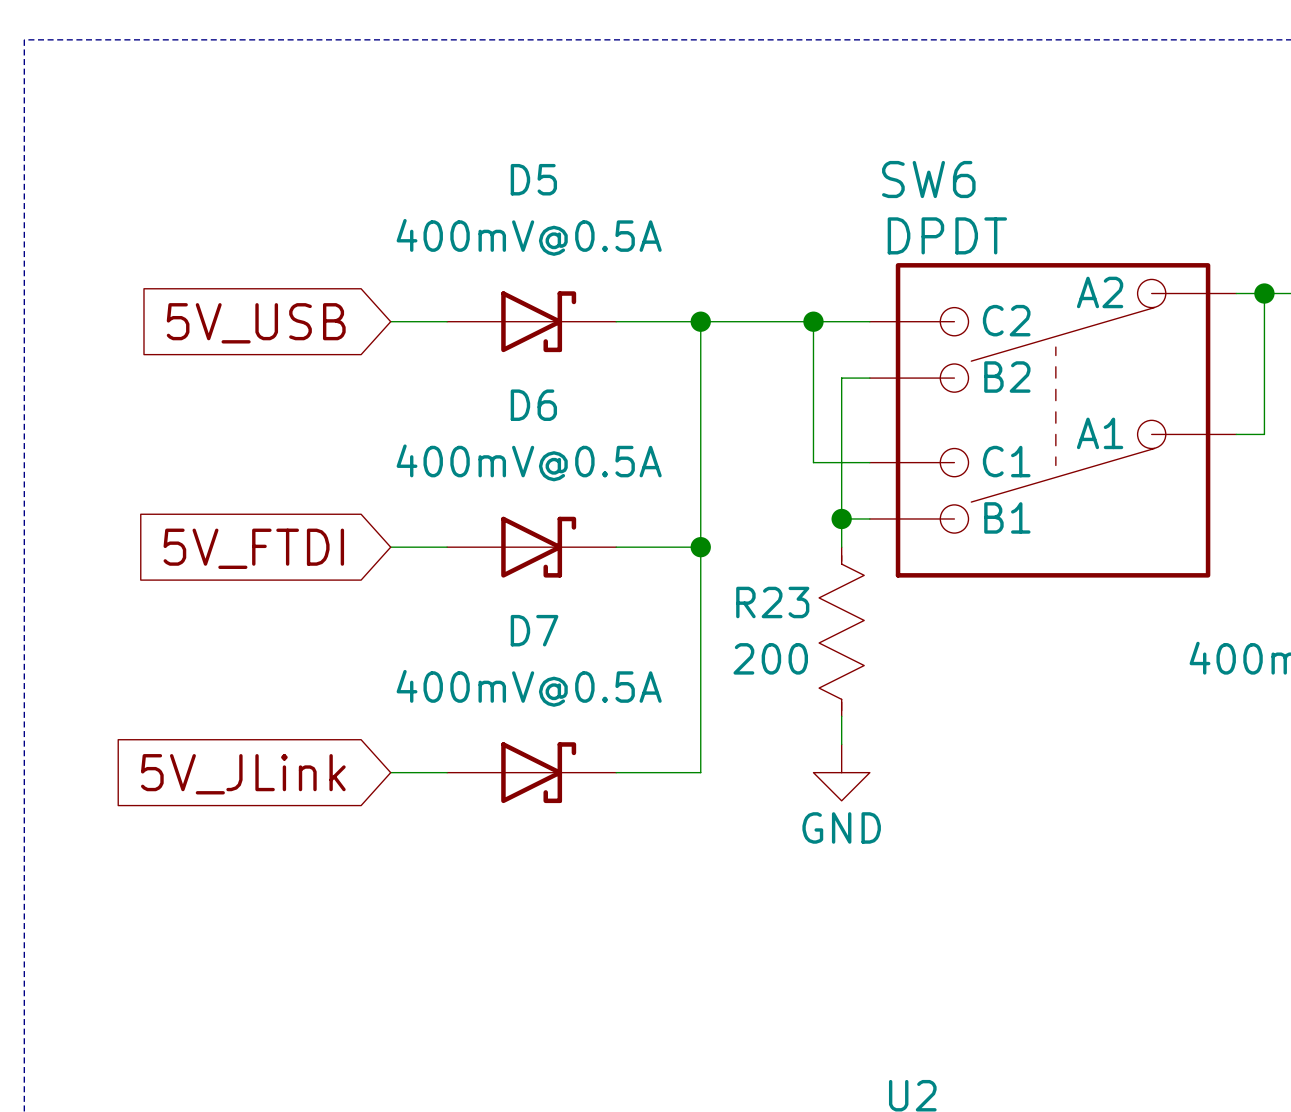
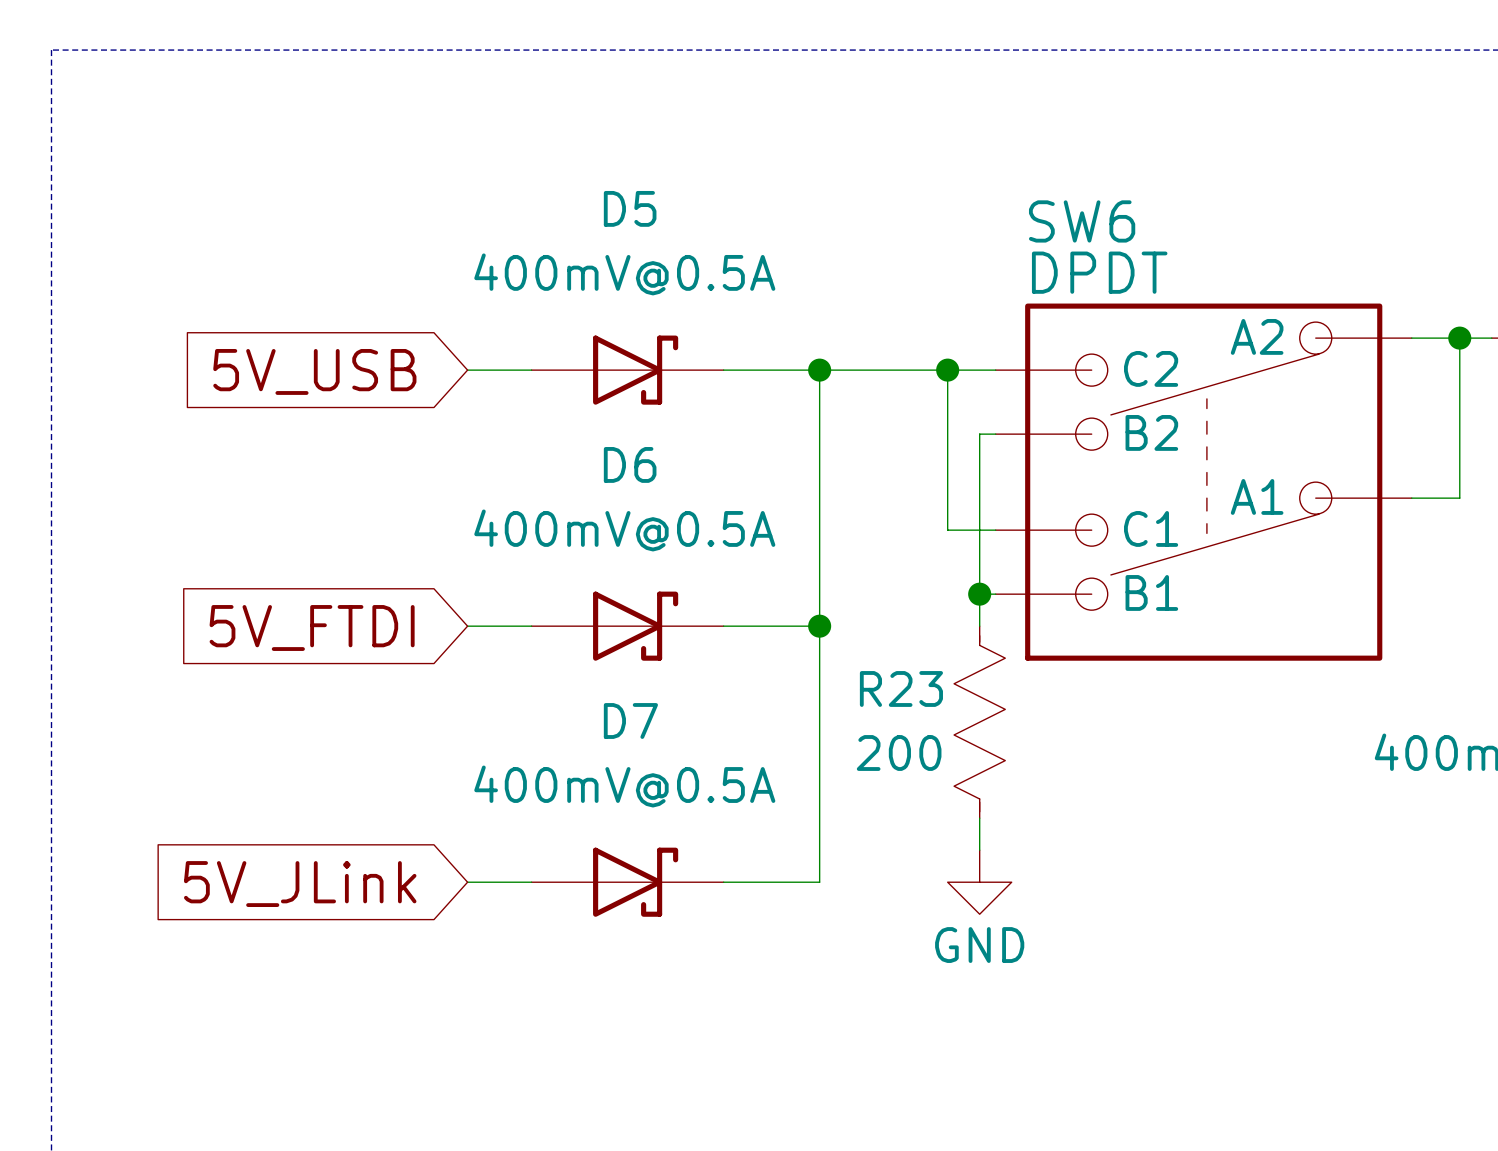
SW6 name position: SW6 (928, 179) -> SW6 (1082, 221)
SW6 position: (1053, 420) -> (1203, 482)

